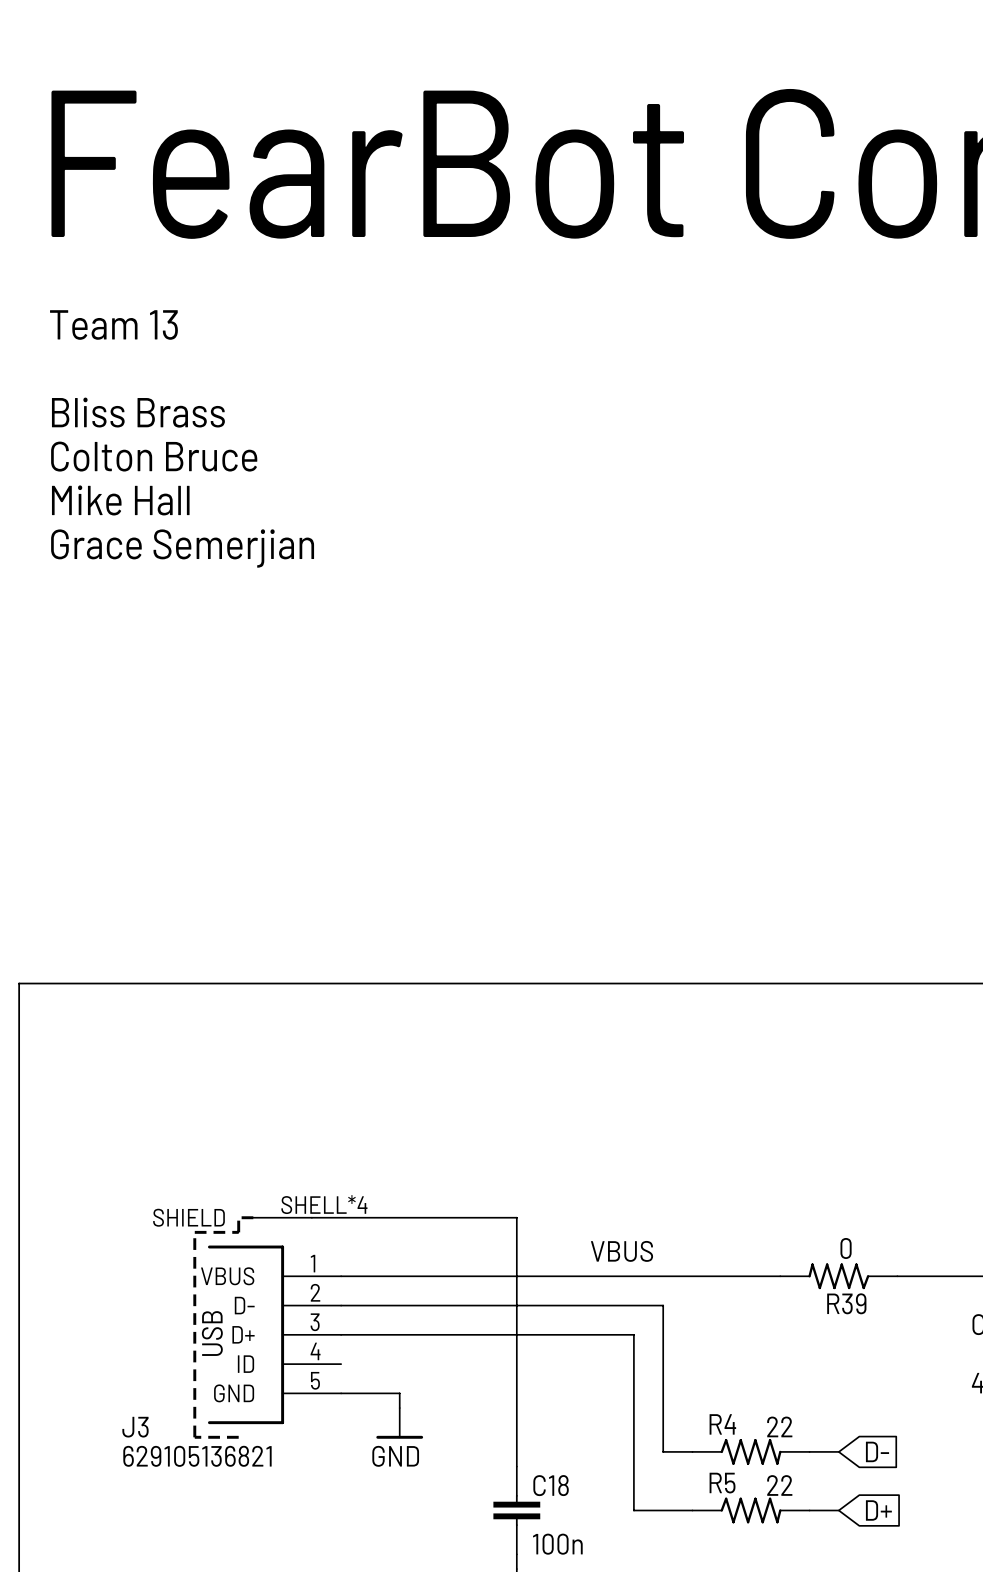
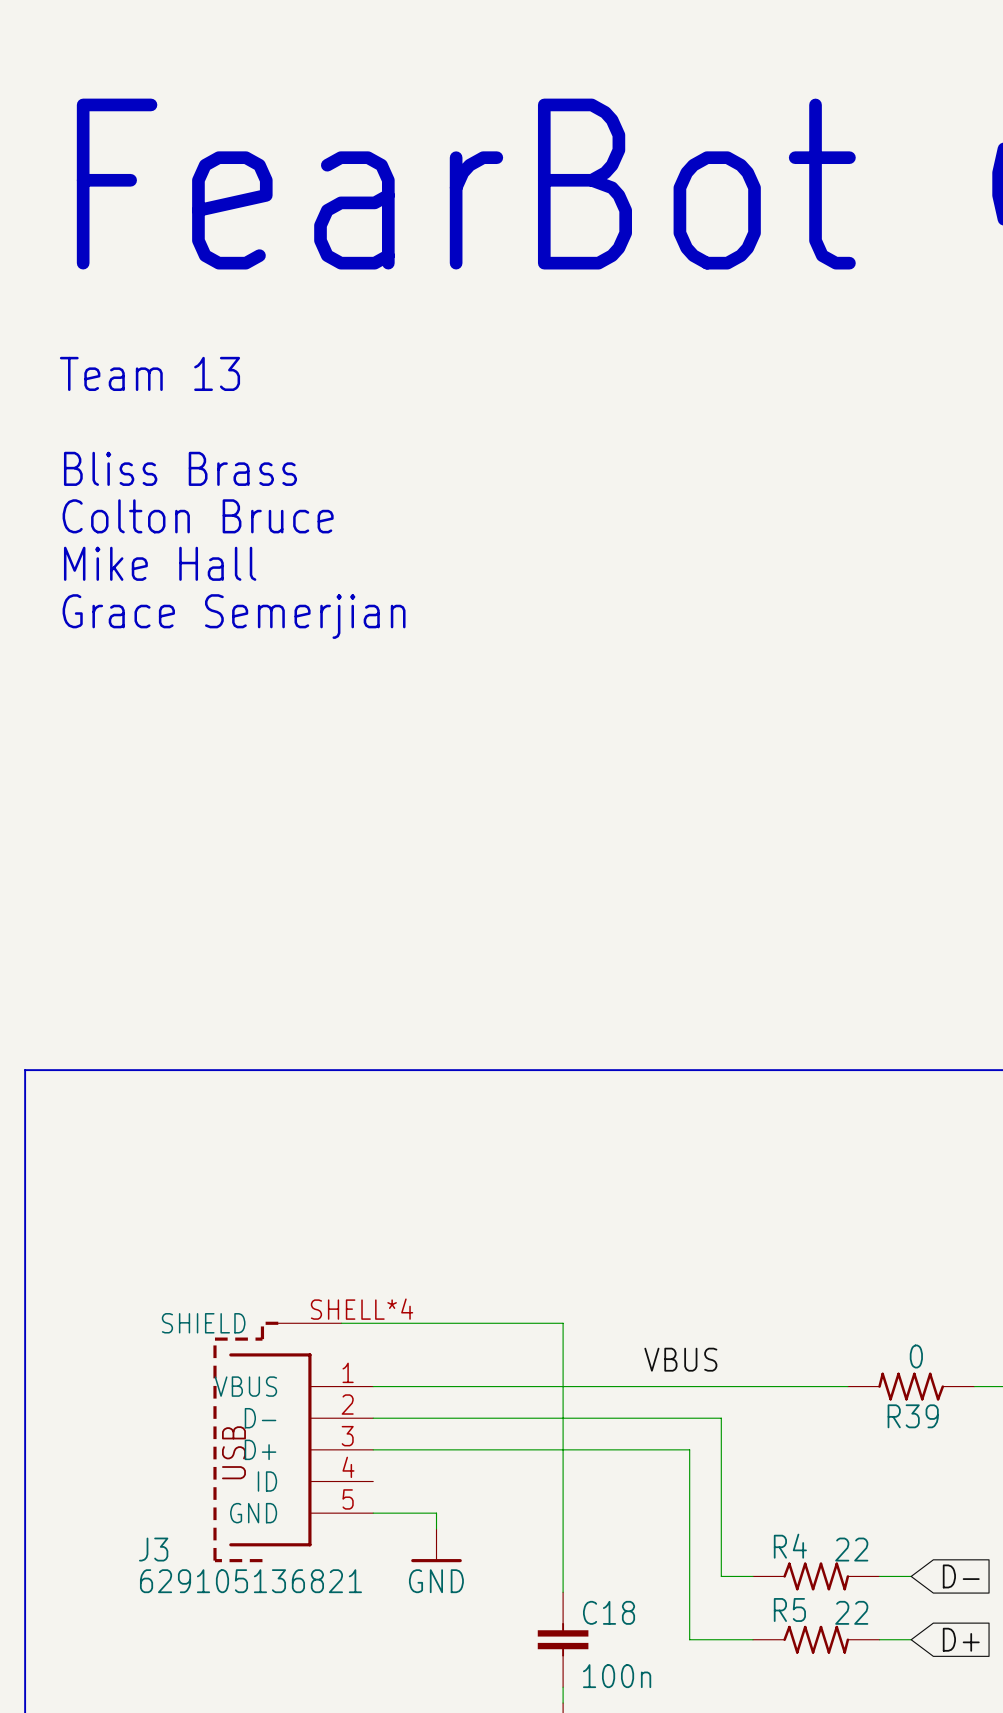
text position: Team 13 (113, 325) -> Team 13 (149, 373)
text position: Bliss Brass (138, 412) -> Bliss Brass (180, 468)
text position: Colton Bruce (154, 456) -> Colton Bruce (198, 516)
text position: Mike Hall (120, 500) -> Mike Hall (160, 563)
text position: Grace Semerjian (182, 548) -> Grace Semerjian (234, 616)

